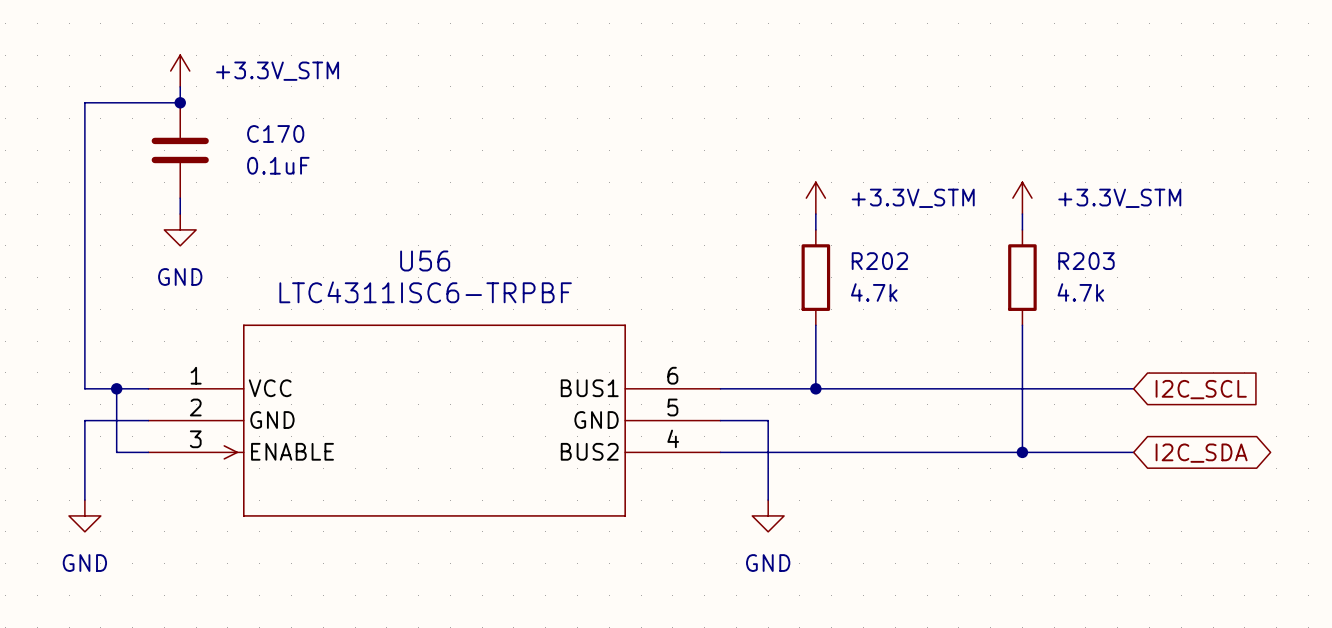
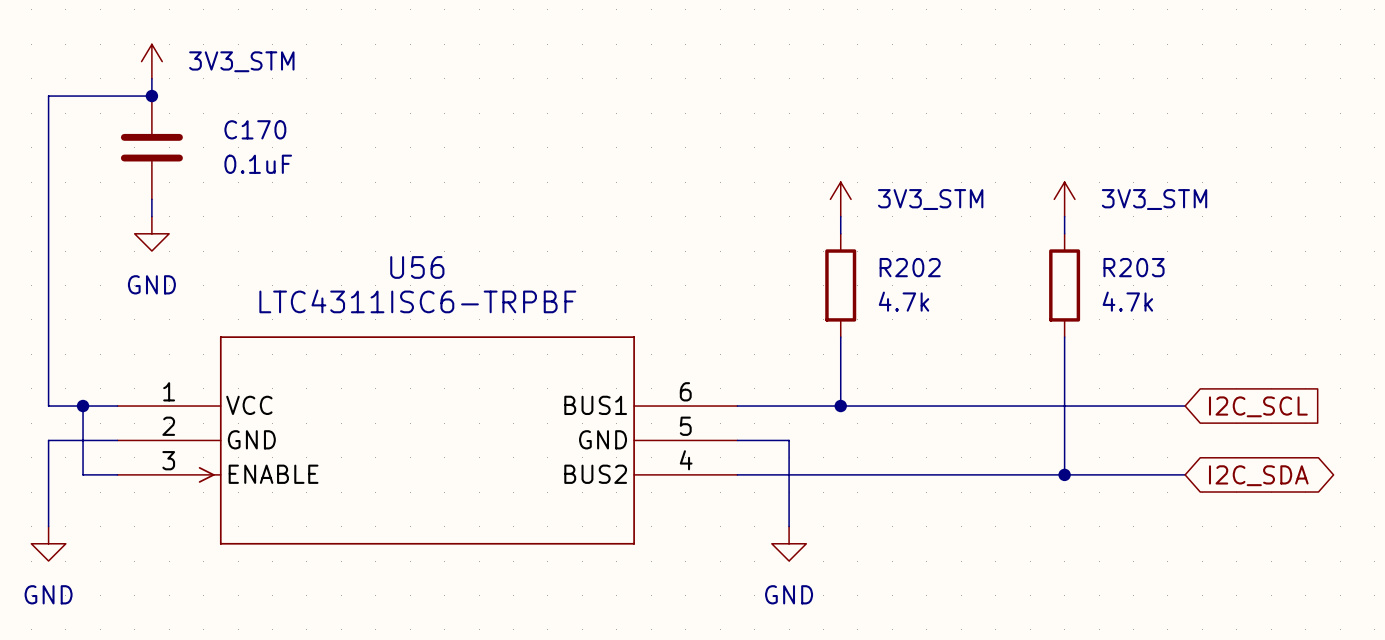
power symbol: +3.3V_STM (180, 71) -> 3V3_STM (151, 61)
power symbol: +3.3V_STM (815, 198) -> 3V3_STM (840, 199)
power symbol: +3.3V_STM (1022, 198) -> 3V3_STM (1064, 199)

